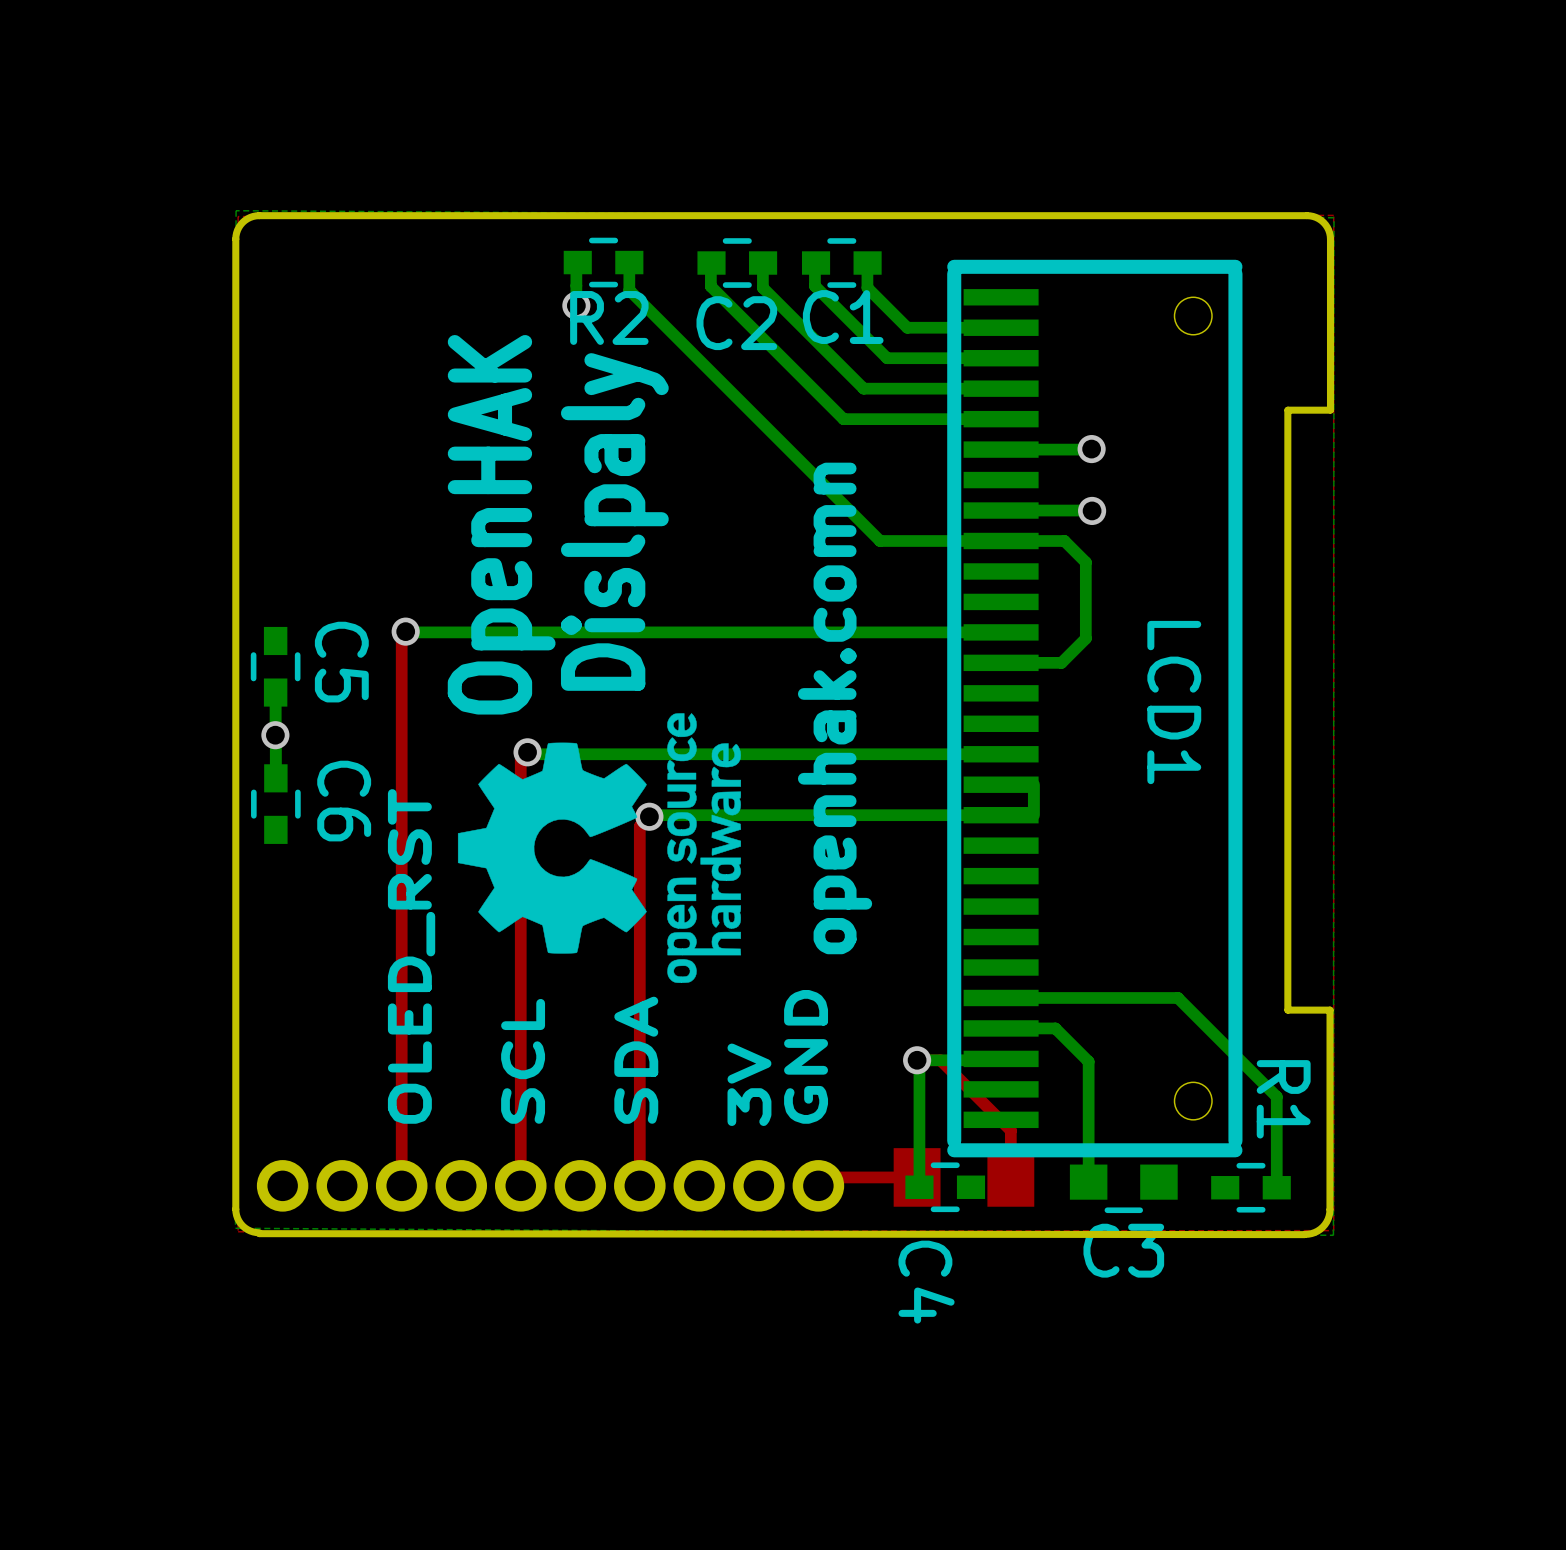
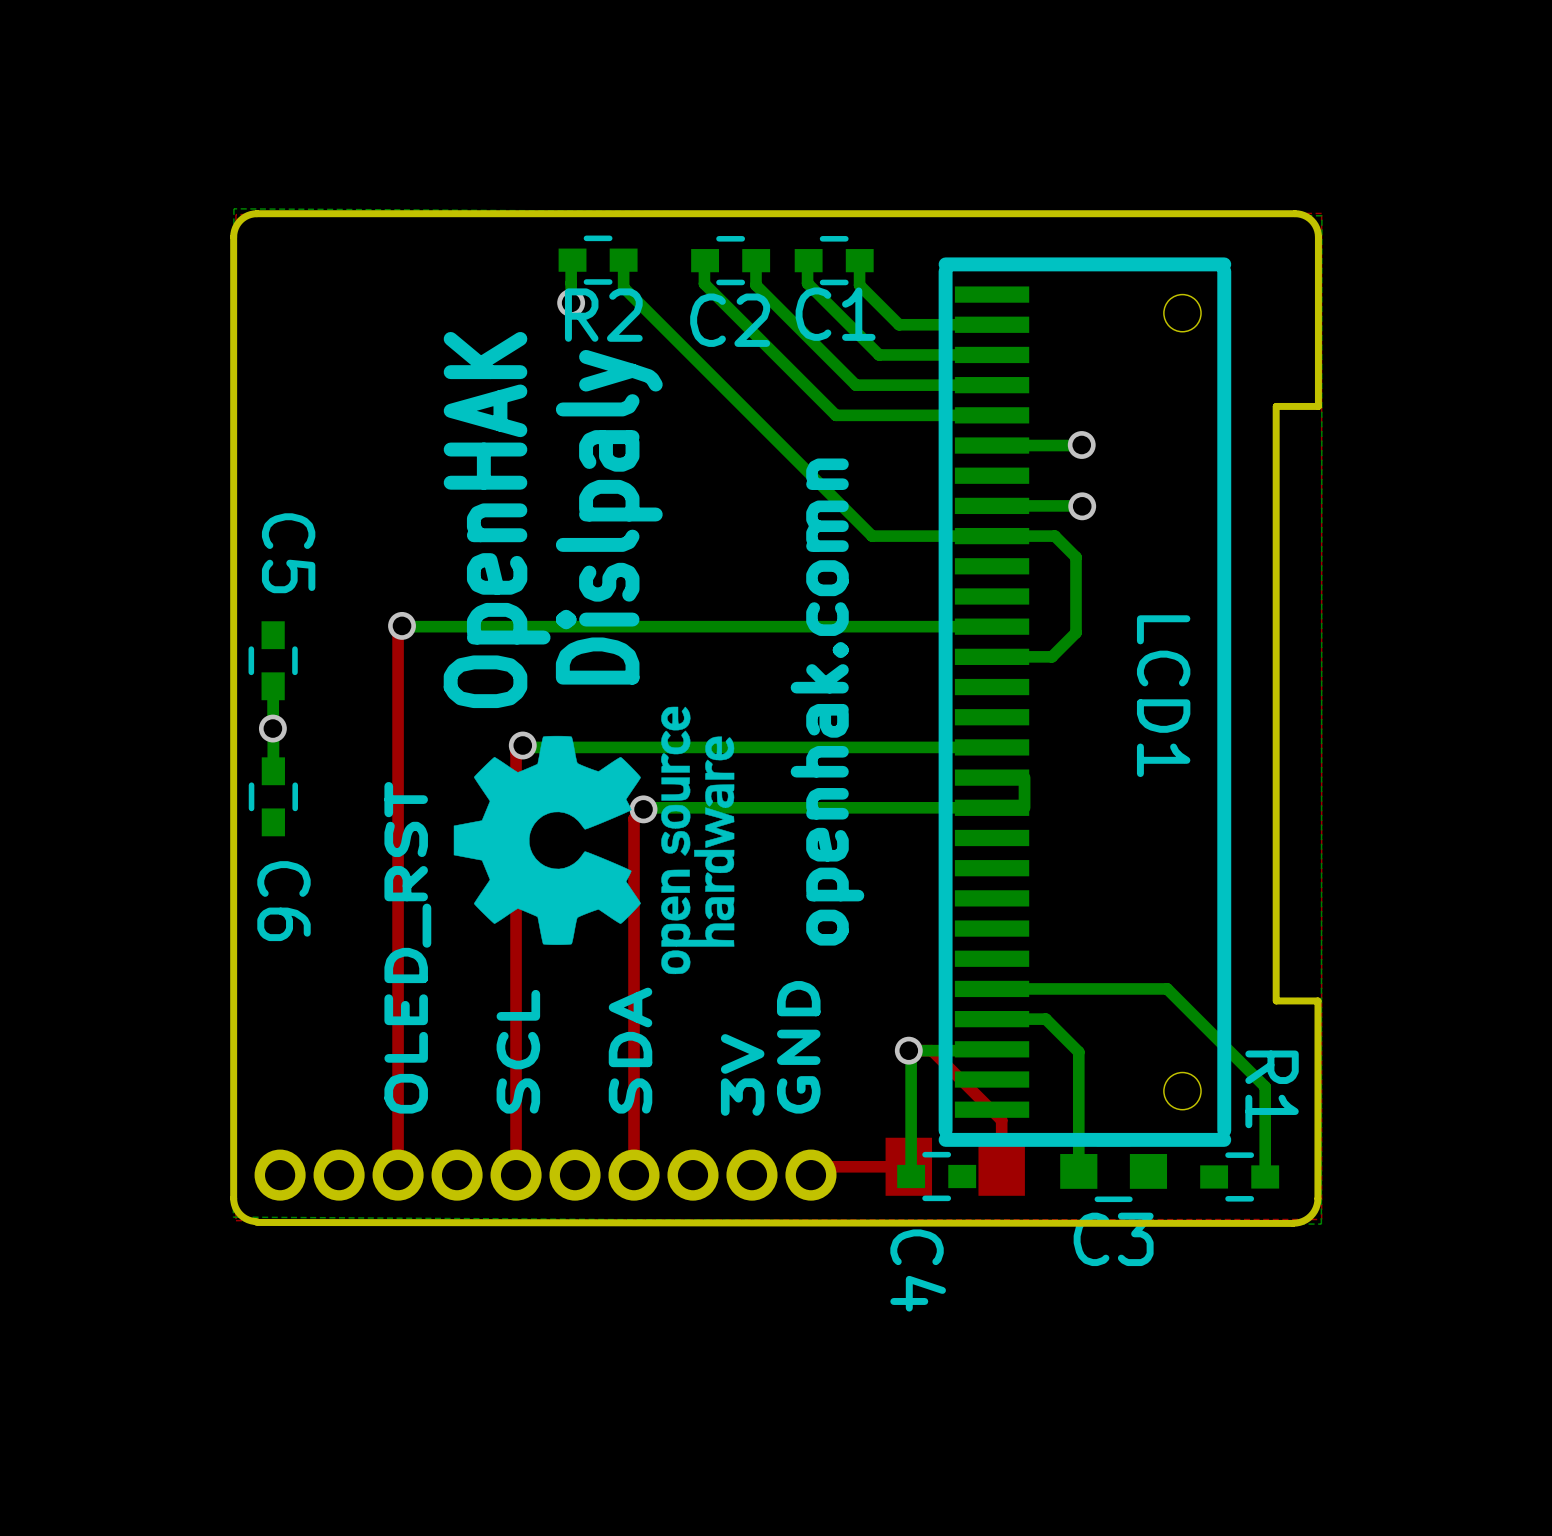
C5 name position: C5 (341, 662) -> C5 (288, 553)
C6 name position: C6 (344, 801) -> C6 (283, 901)

